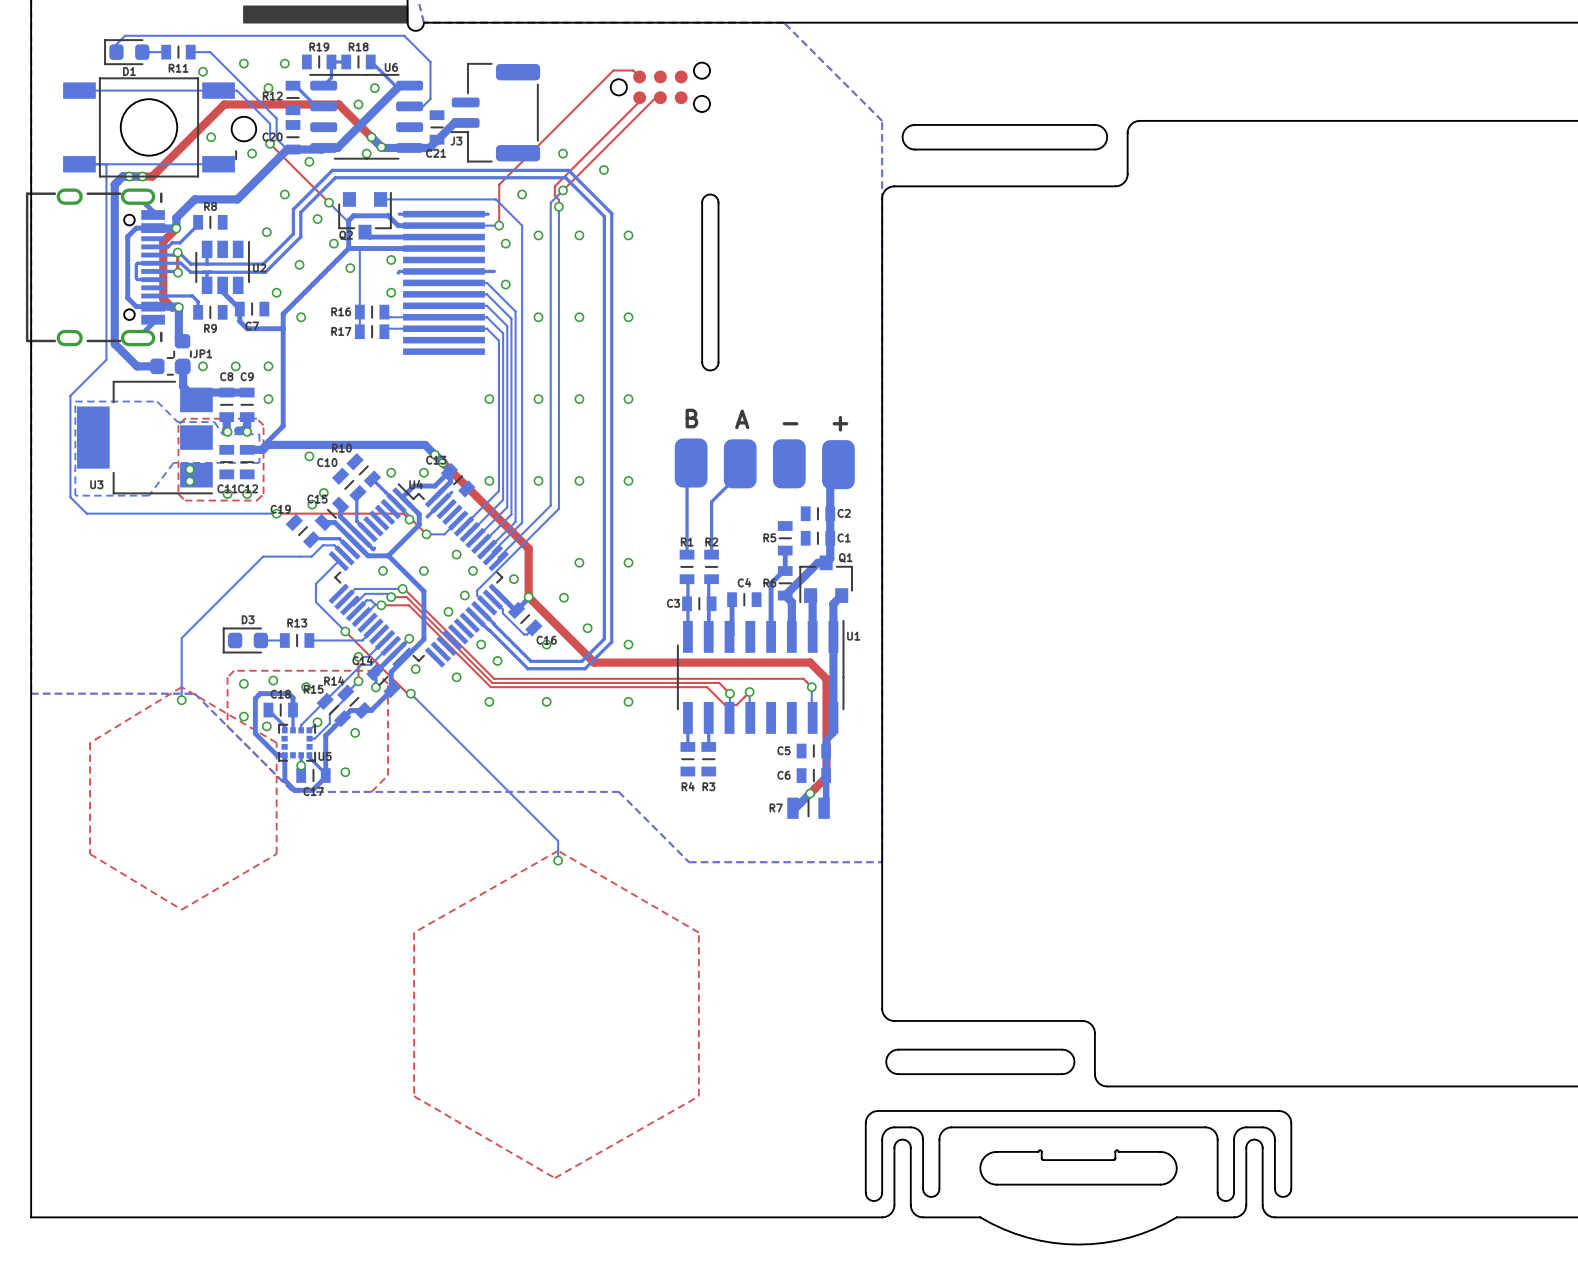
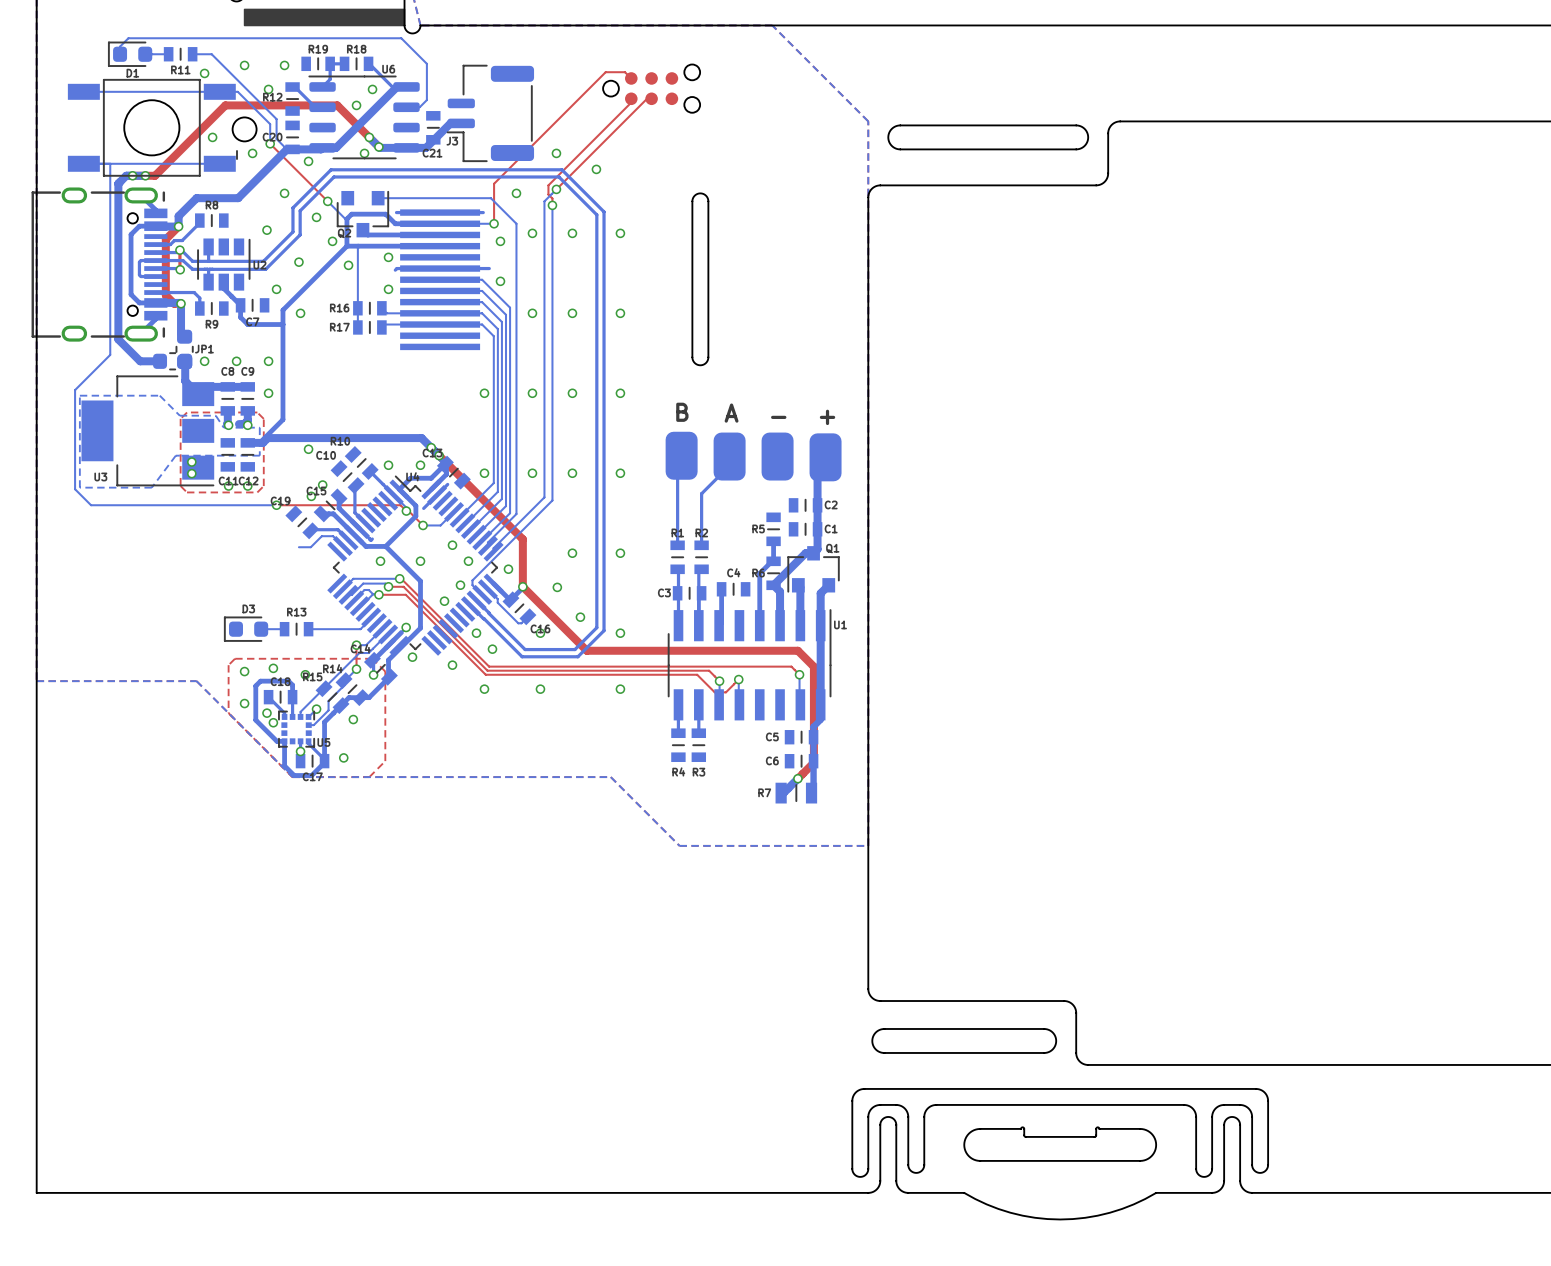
bottom track: (299, 556) (263, 556) (181, 638) (181, 700) -> none
bottom track: (338, 561) (315, 583) (315, 602) (345, 631) -> none
top track: (345, 631) (407, 693) (410, 693) -> none
via: (345, 631) -> none
top zone outline: (181, 687) (276, 742) (276, 854) (181, 909) (90, 854) (90, 742) (181, 687) -> none
bottom track: (410, 693) (558, 840) (558, 860) -> none
via: (410, 693) -> none
via: (181, 700) -> none
via: none -> (273, 722)
top zone outline: (558, 850) (698, 932) (698, 1096) (554, 1178) (414, 1096) (414, 932) (558, 850) -> none
via: (558, 860) -> none

